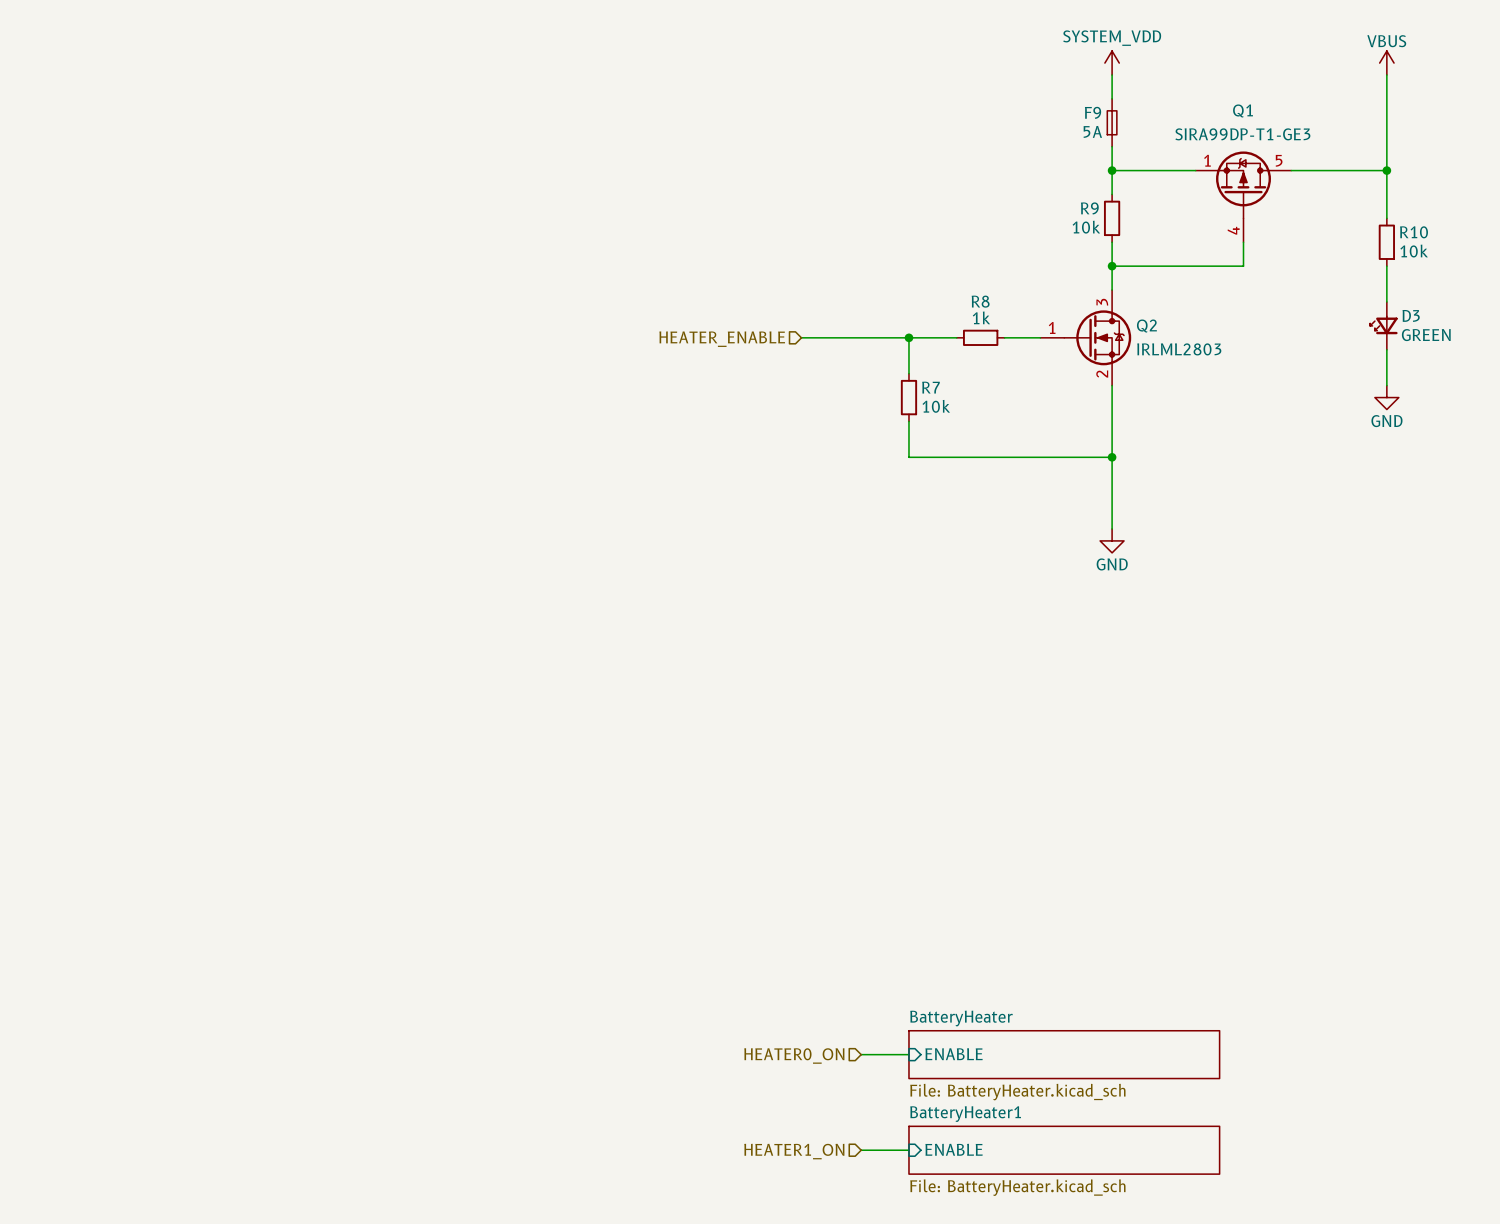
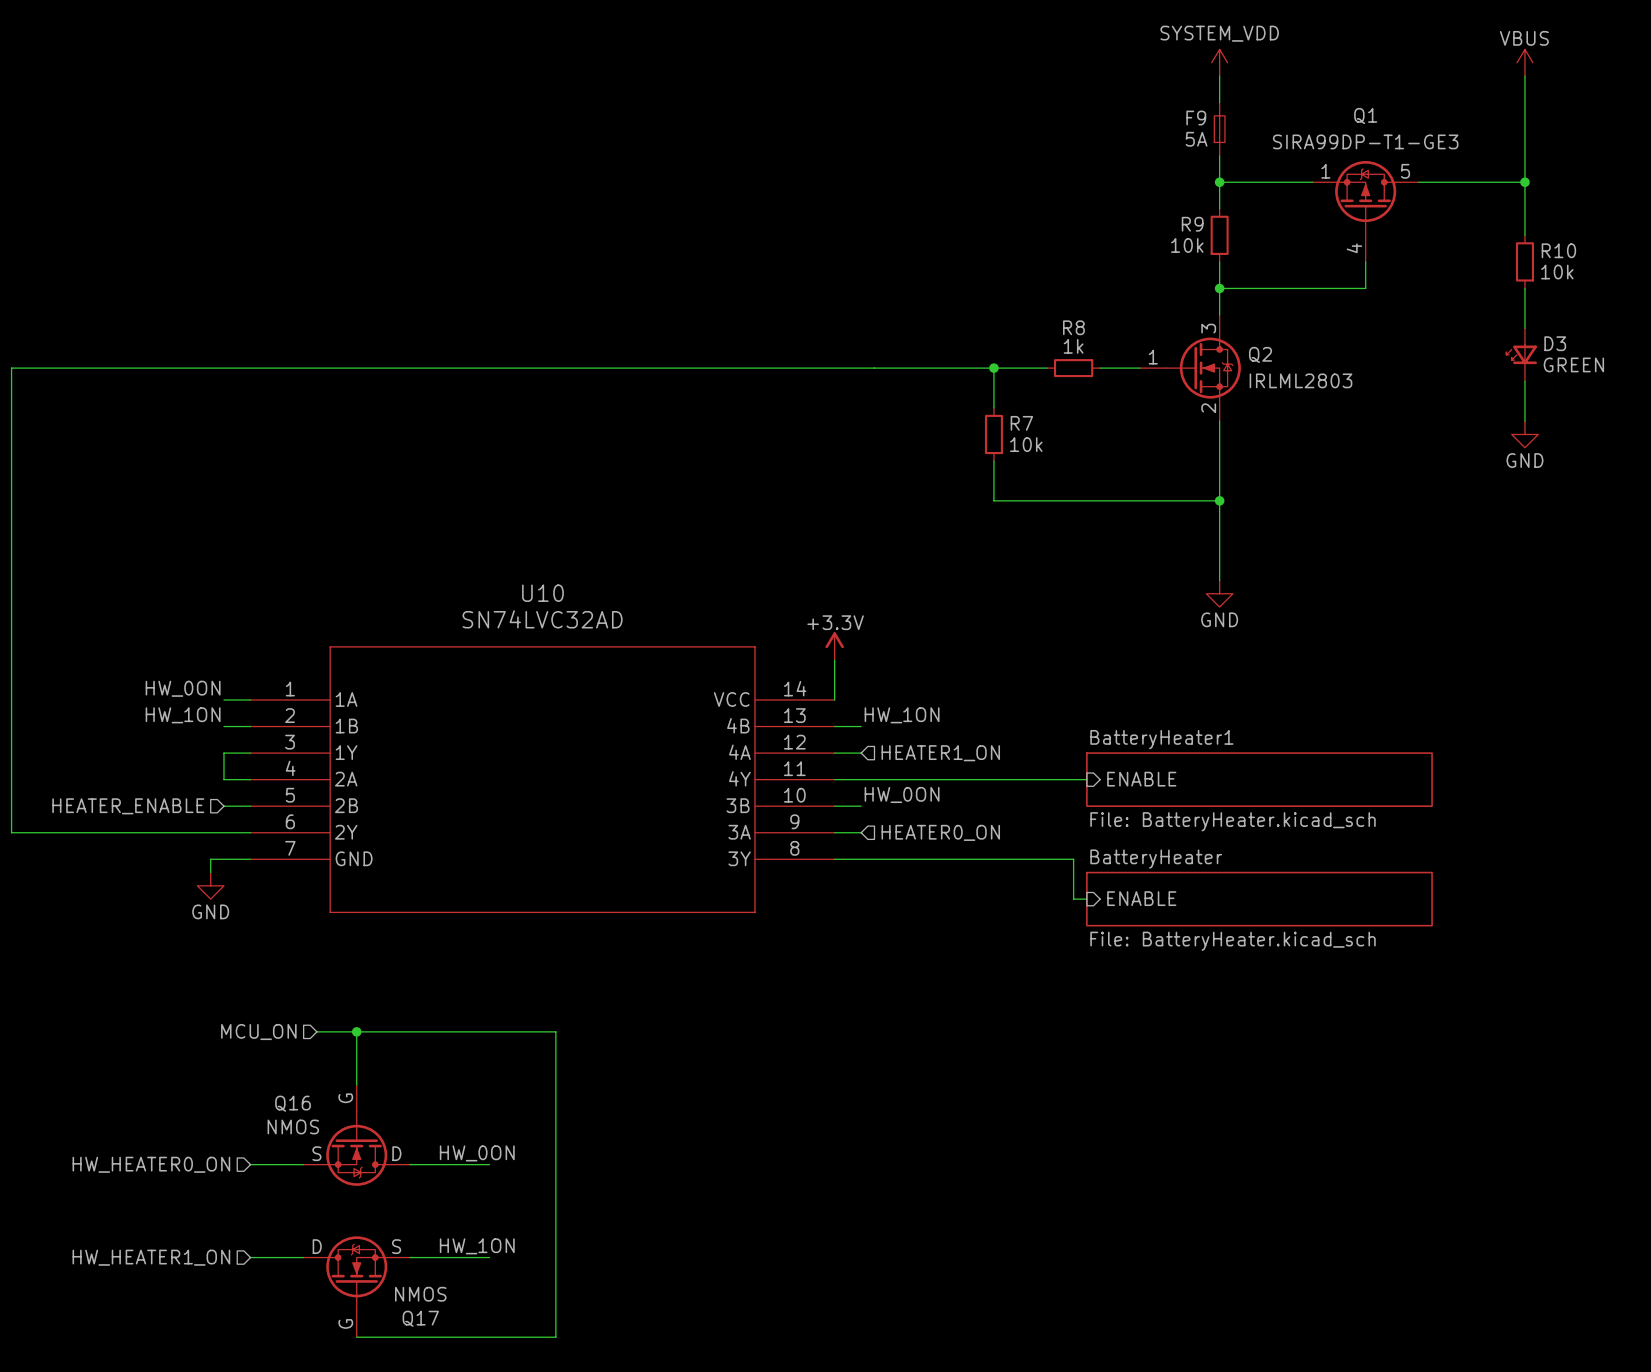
wire: none -> (874, 368) (11, 368) (11, 832) (250, 832)
hierarchical label: HEATER_ENABLE (722, 339) -> none
power symbol: none -> +3.3V (834, 646)
wire: none -> (834, 660) (834, 699)
label: none -> HW_0ON (183, 688)
wire: none -> (223, 699) (250, 699)
label: none -> HW_1ON (183, 715)
label: none -> HW_1ON (902, 715)
wire: none -> (223, 726) (250, 726)
wire: none -> (834, 726) (861, 726)
wire: none -> (250, 753) (223, 753) (223, 779) (250, 779)
wire: none -> (834, 753) (861, 753)
hierarchical label: none -> HEATER1_ON (940, 753)
sheet pin: none -> ENABLE (1141, 779)
U10: none -> SN74LVC32AD (542, 779)
wire: none -> (834, 779) (1086, 779)
label: none -> HW_0ON (902, 794)
wire: none -> (223, 806) (250, 806)
wire: none -> (834, 806) (861, 806)
hierarchical label: none -> HEATER_ENABLE (128, 806)
wire: none -> (834, 832) (861, 832)
hierarchical label: none -> HEATER0_ON (940, 832)
wire: none -> (250, 859) (210, 859) (210, 872)
wire: none -> (834, 859) (1073, 859) (1073, 899) (1086, 899)
power symbol: none -> GND (210, 885)
sheet pin: none -> ENABLE (1141, 898)
sheet BatteryHeater: none -> File: BatteryHeater.kicad_sch (1259, 899)
wire: none -> (316, 1031) (555, 1031) (555, 1337) (356, 1337)
wire: none -> (356, 1031) (356, 1084)
junction: none -> (356, 1031)
hierarchical label: none -> MCU_ON (258, 1032)
Q16: none -> NMOS (356, 1135)
label: none -> HW_0ON (477, 1153)
wire: none -> (250, 1164) (303, 1164)
wire: none -> (409, 1164) (489, 1164)
wire: (861, 1054) (908, 1054) -> none
sheet pin: ENABLE (954, 1054) -> none
sheet BatteryHeater: File: BatteryHeater.kicad_sch (1064, 1054) -> none
hierarchical label: none -> HW_HEATER0_ON (151, 1164)
hierarchical label: HEATER0_ON (794, 1055) -> none
label: none -> HW_1ON (477, 1246)
wire: none -> (250, 1257) (303, 1257)
wire: none -> (409, 1257) (489, 1257)
hierarchical label: none -> HW_HEATER1_ON (151, 1257)
sheet pin: ENABLE (954, 1149) -> none
wire: (861, 1150) (908, 1150) -> none
sheet BatteryHeater1 position: (1064, 1150) -> (1259, 779)
hierarchical label: HEATER1_ON (794, 1151) -> none
Q17: none -> NMOS (356, 1286)

